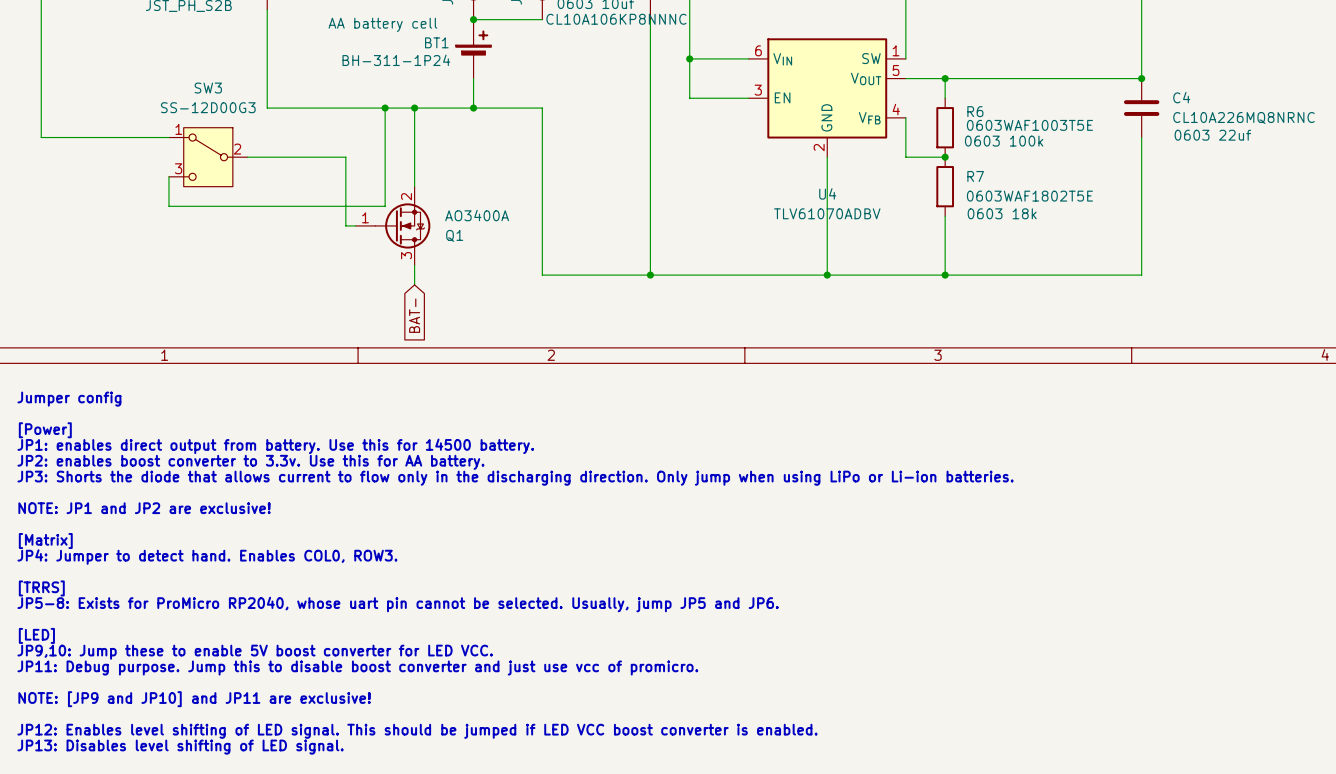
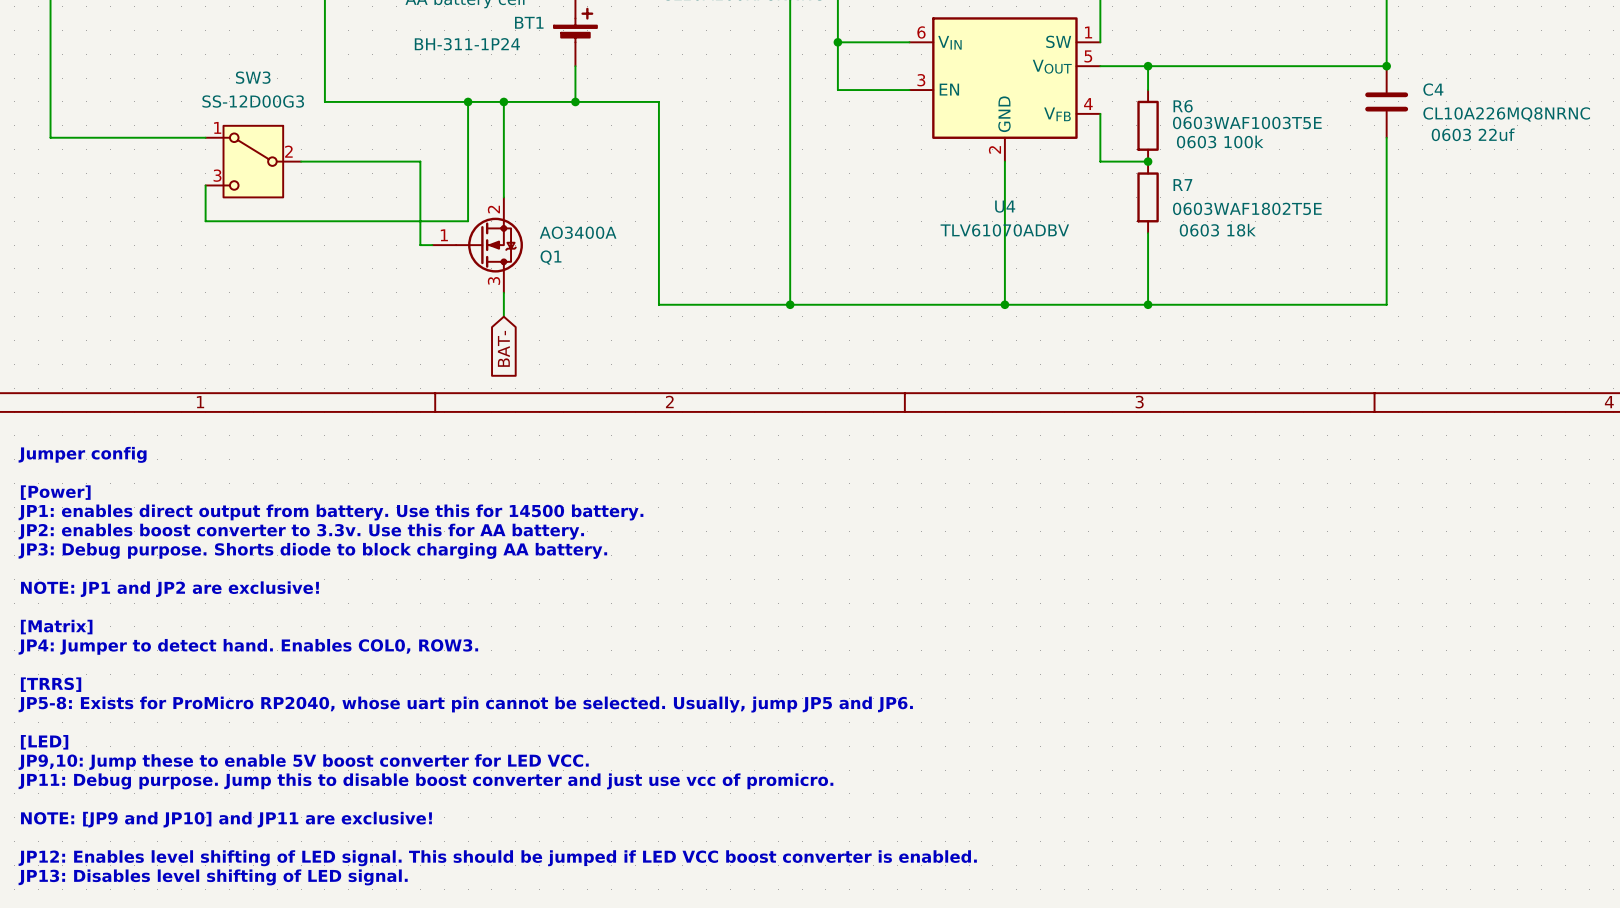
text: JP3: Shorts the diode that allows current to flow only in the discharging direction. Only jump when using LiPo or Li-ion batteries. (515, 478) -> JP3: Debug purpose. Shorts diode to block charging AA battery. (312, 550)

